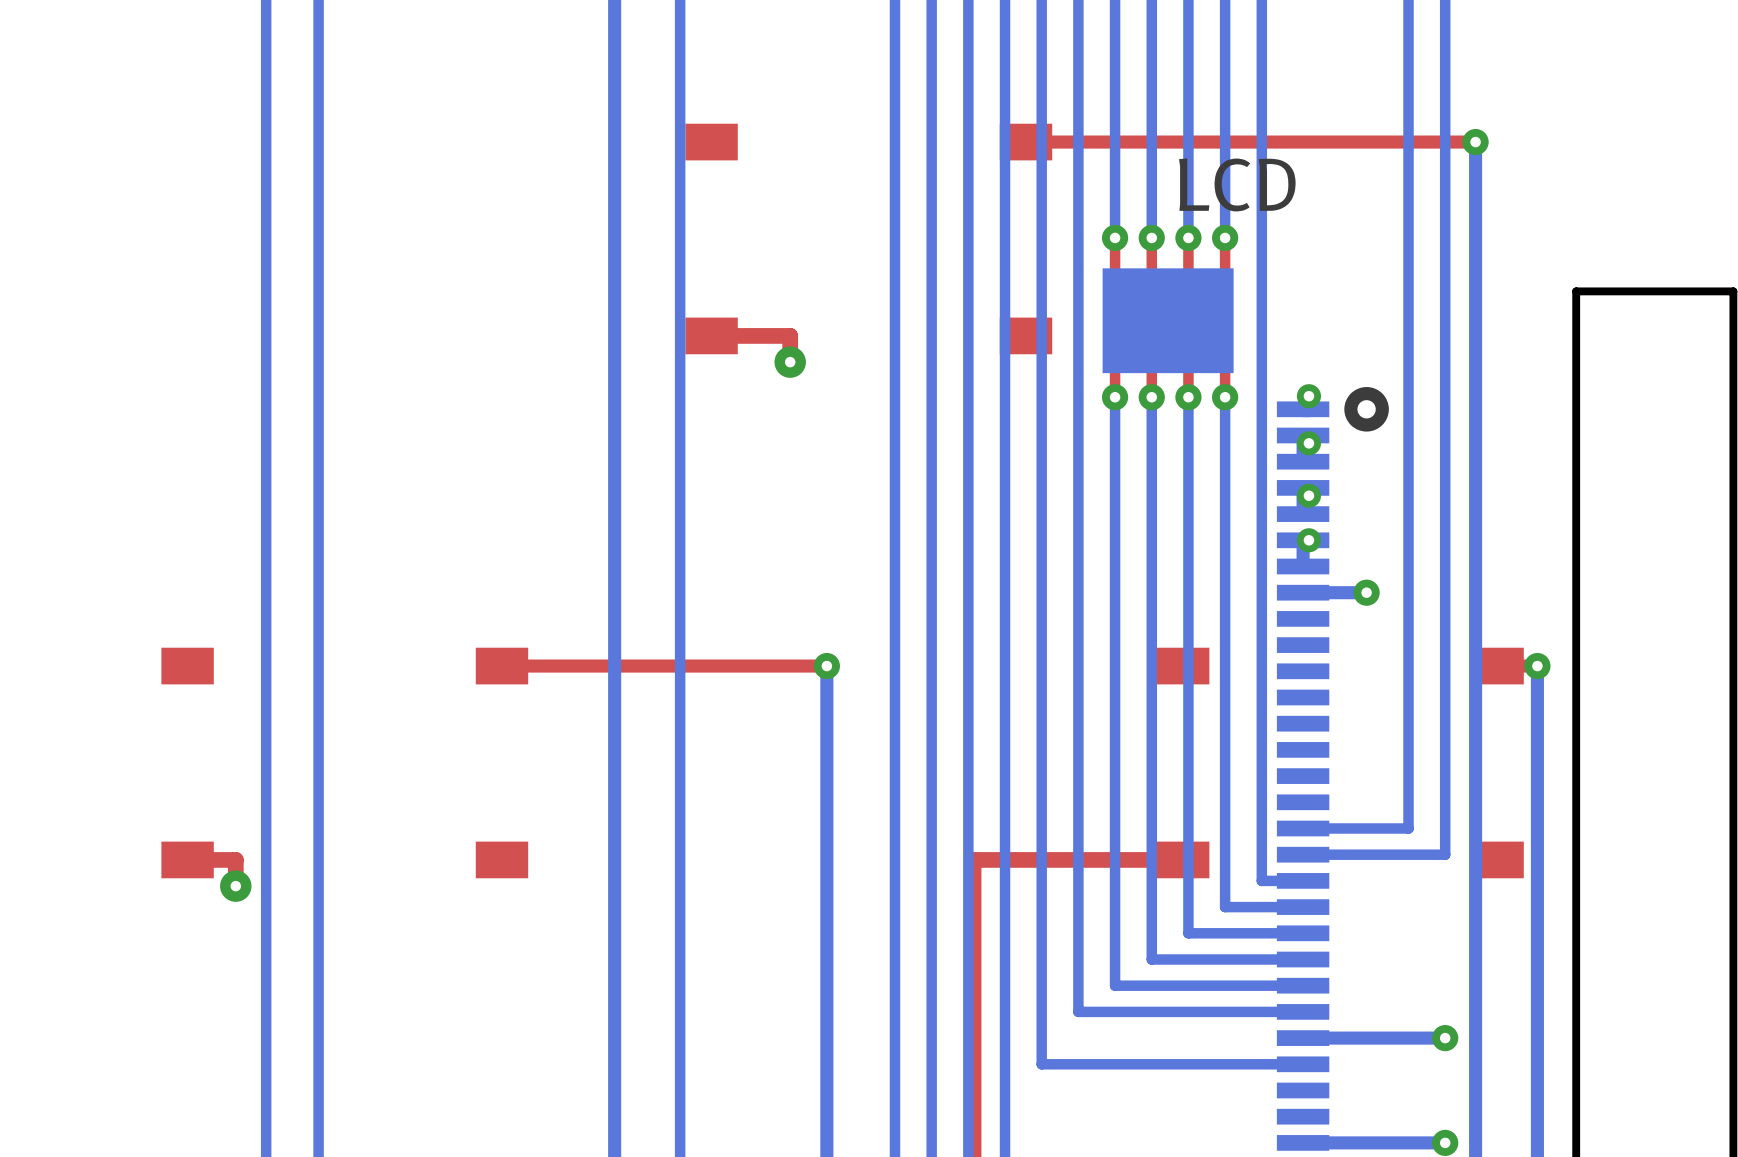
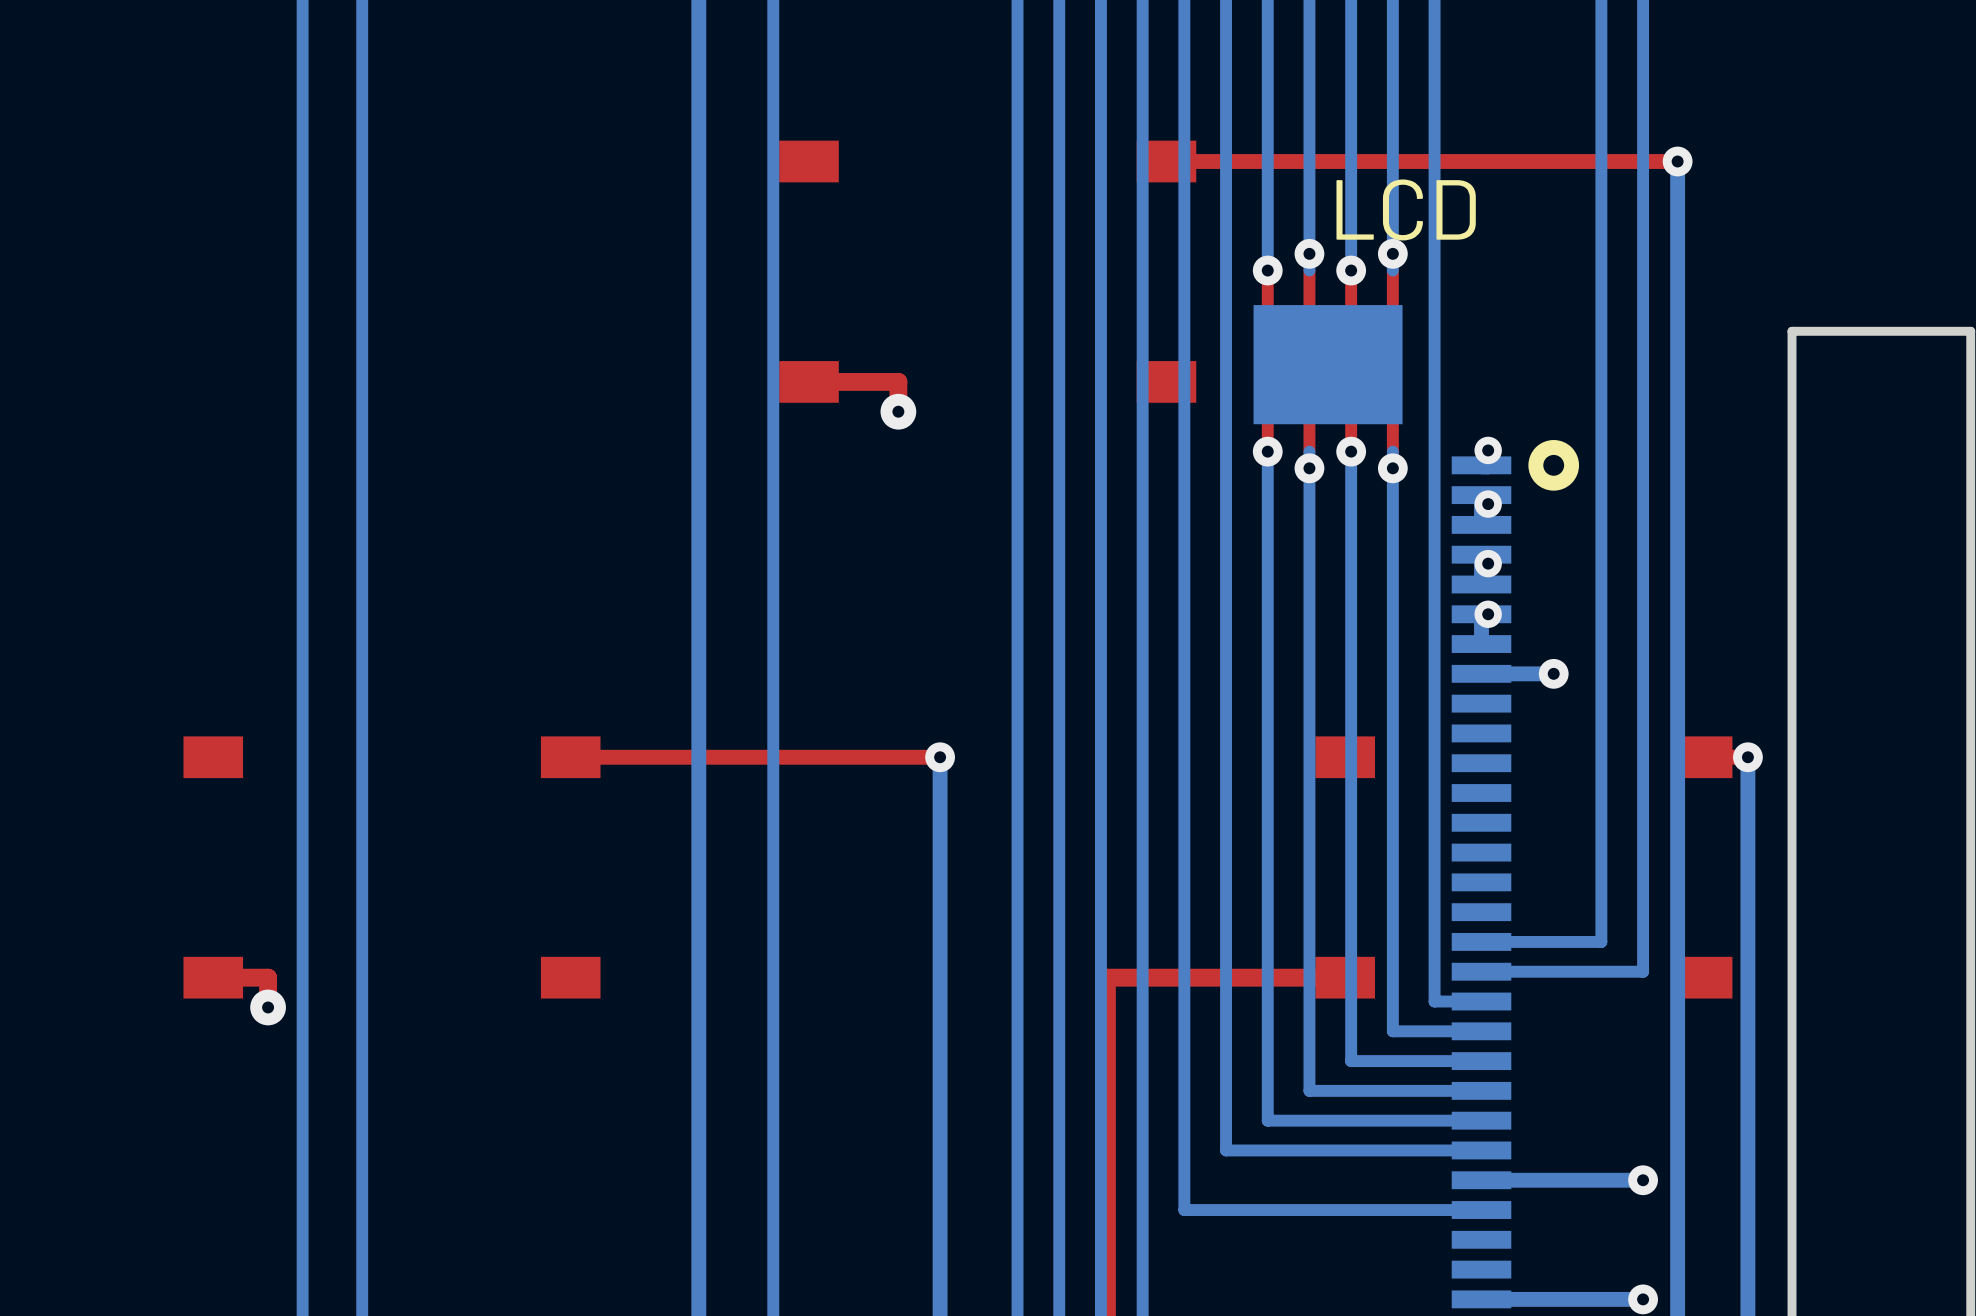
via position: (1151, 237) -> (1309, 253)
via position: (1225, 237) -> (1392, 253)
via position: (1151, 397) -> (1309, 468)
via position: (1225, 397) -> (1392, 468)

